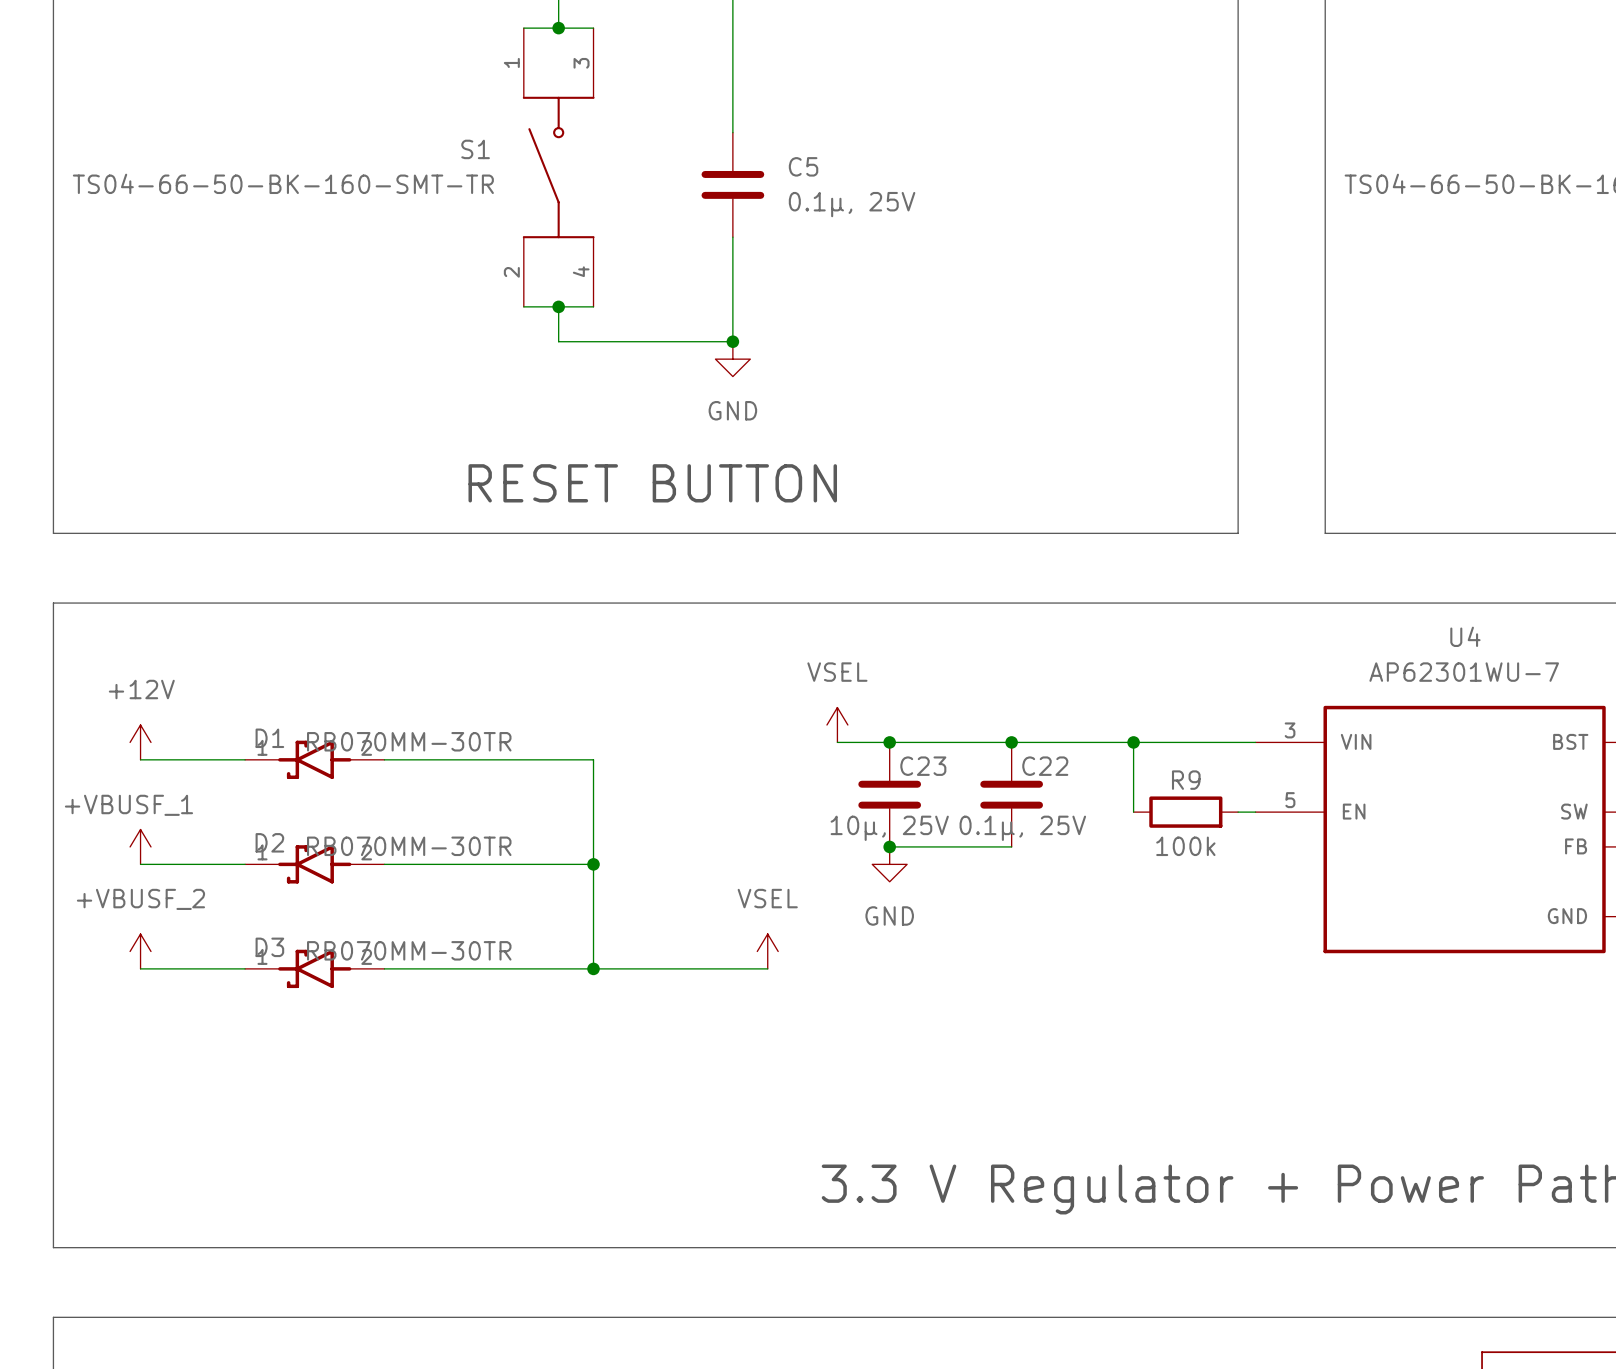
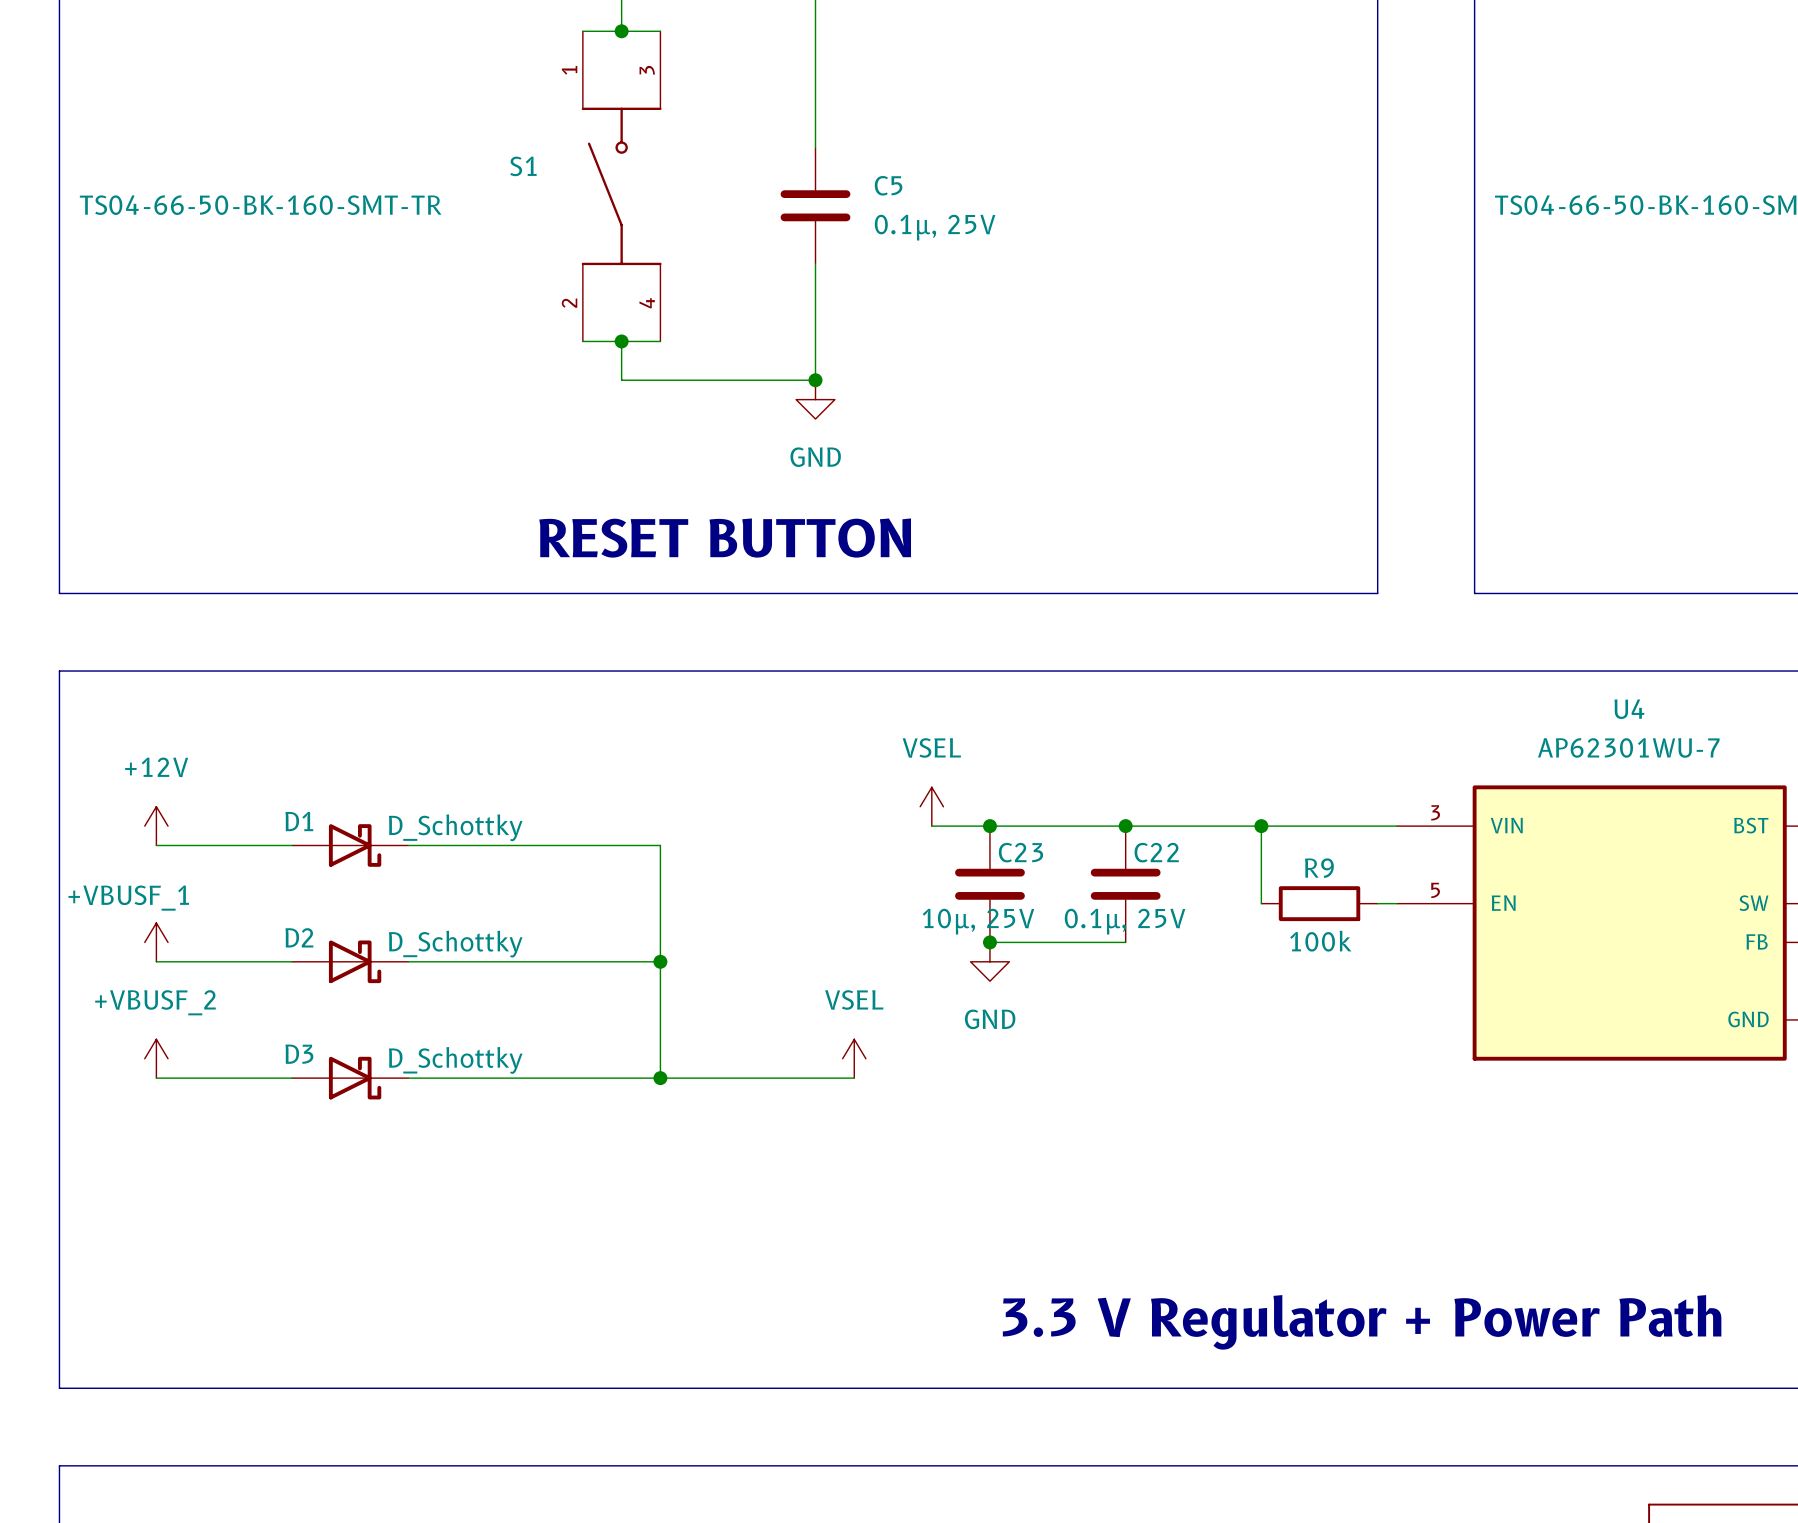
D1 symbol: [245, 740, 385, 780] -> [292, 824, 409, 867]
D1 value: RB070MM-30TR (409, 741) -> D_Schottky (455, 827)
D2 symbol: [245, 845, 385, 884] -> [292, 940, 409, 984]
D2 value: RB070MM-30TR (409, 846) -> D_Schottky (455, 944)
D3 symbol: [245, 949, 385, 989] -> [292, 1056, 409, 1100]
D3 value: RB070MM-30TR (409, 950) -> D_Schottky (455, 1060)

